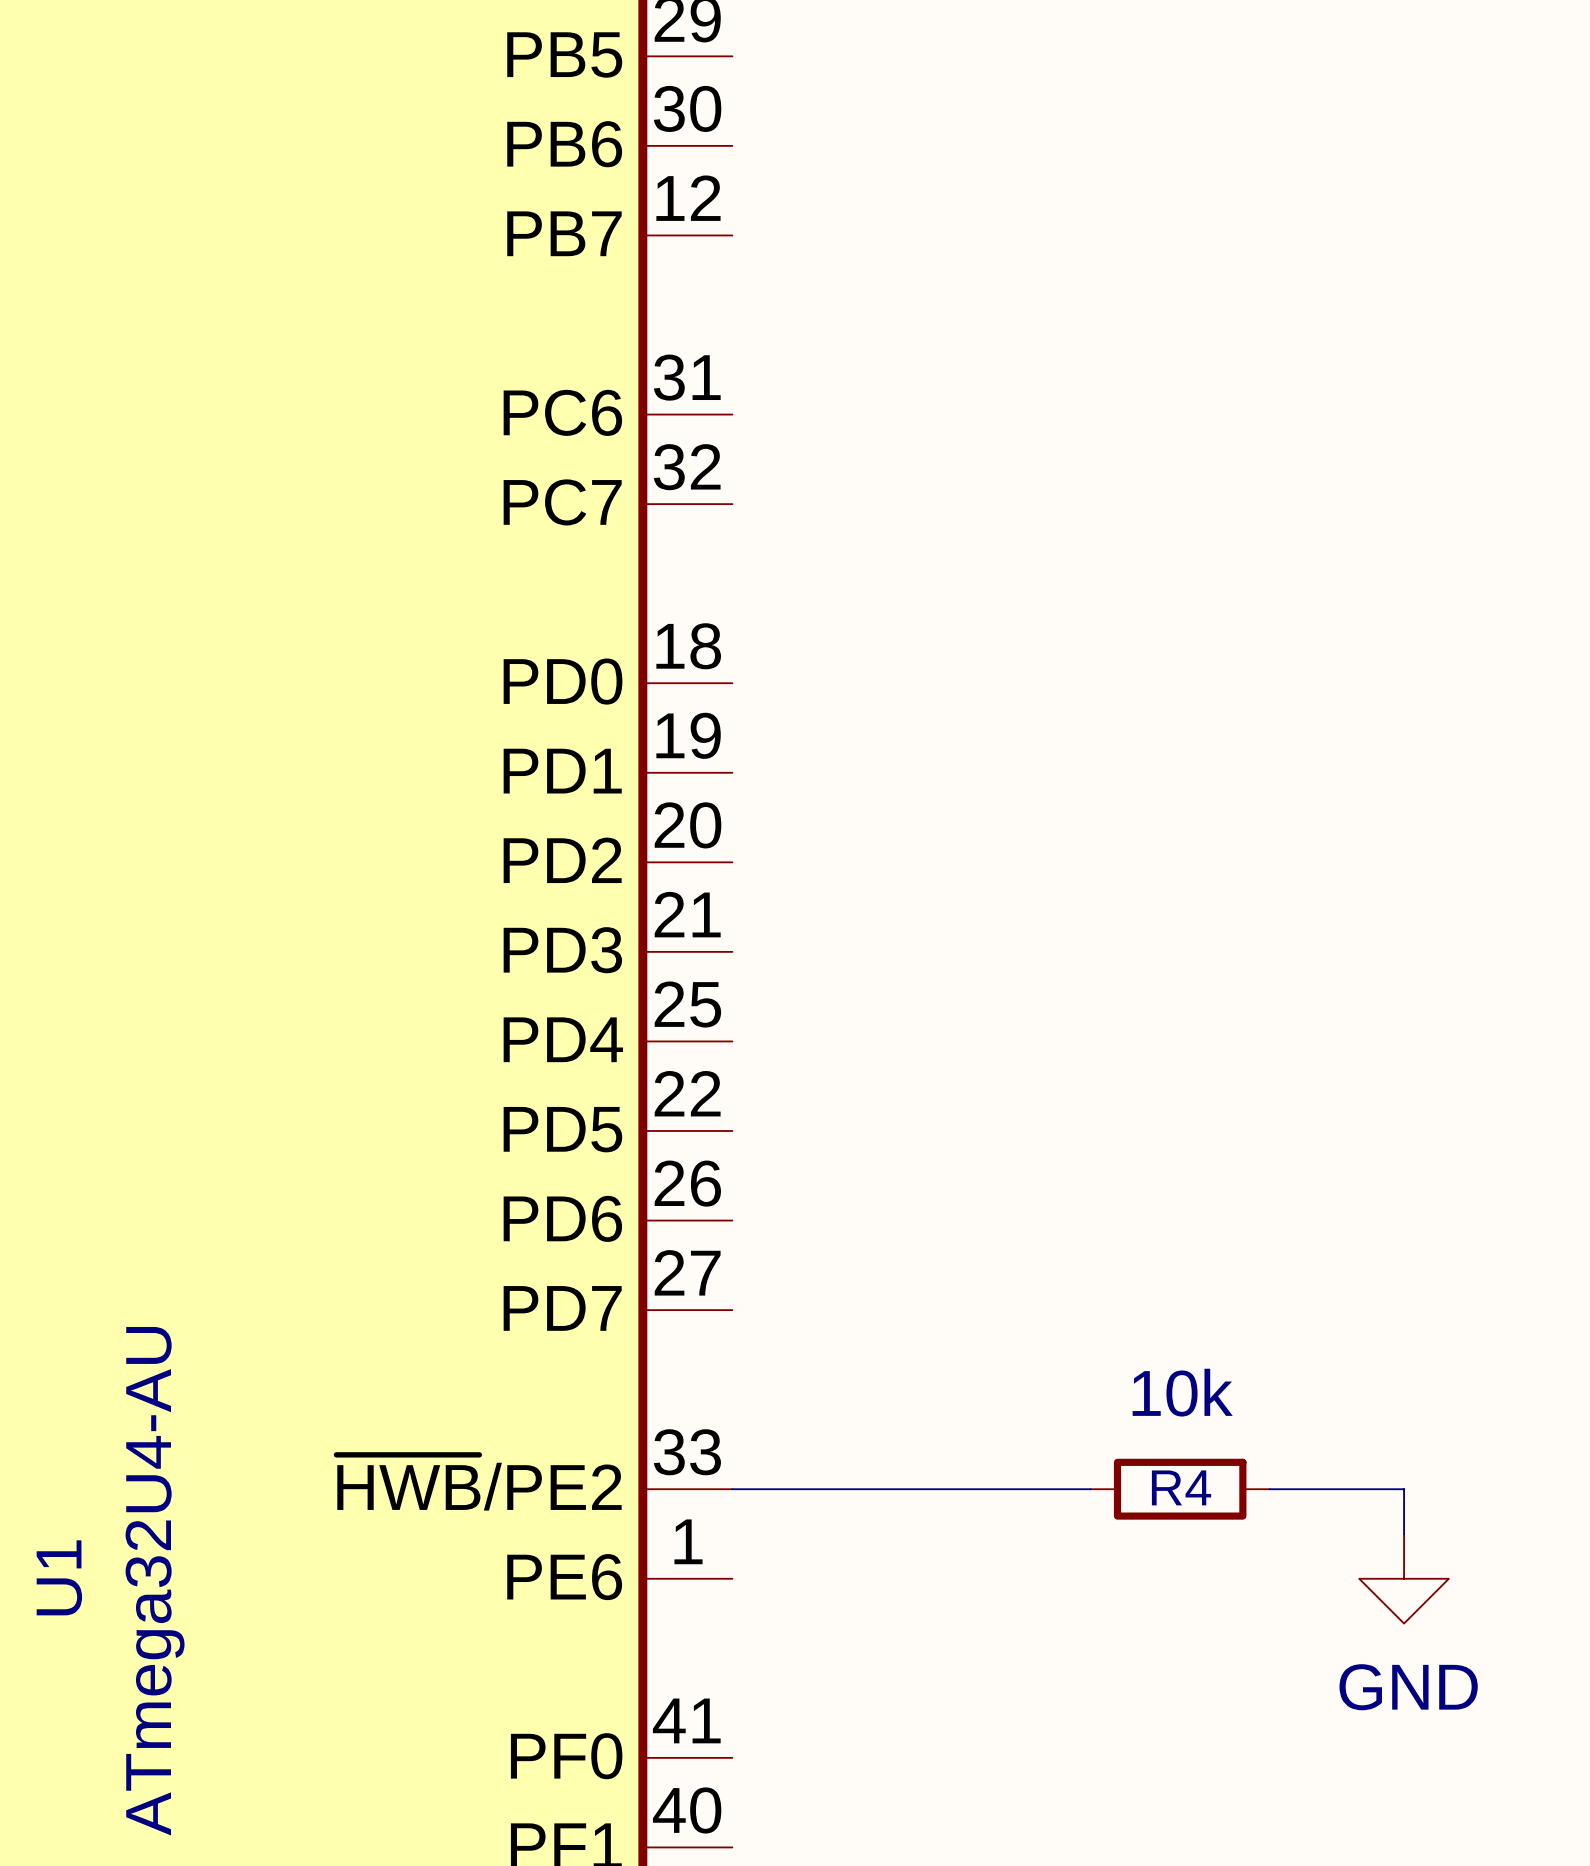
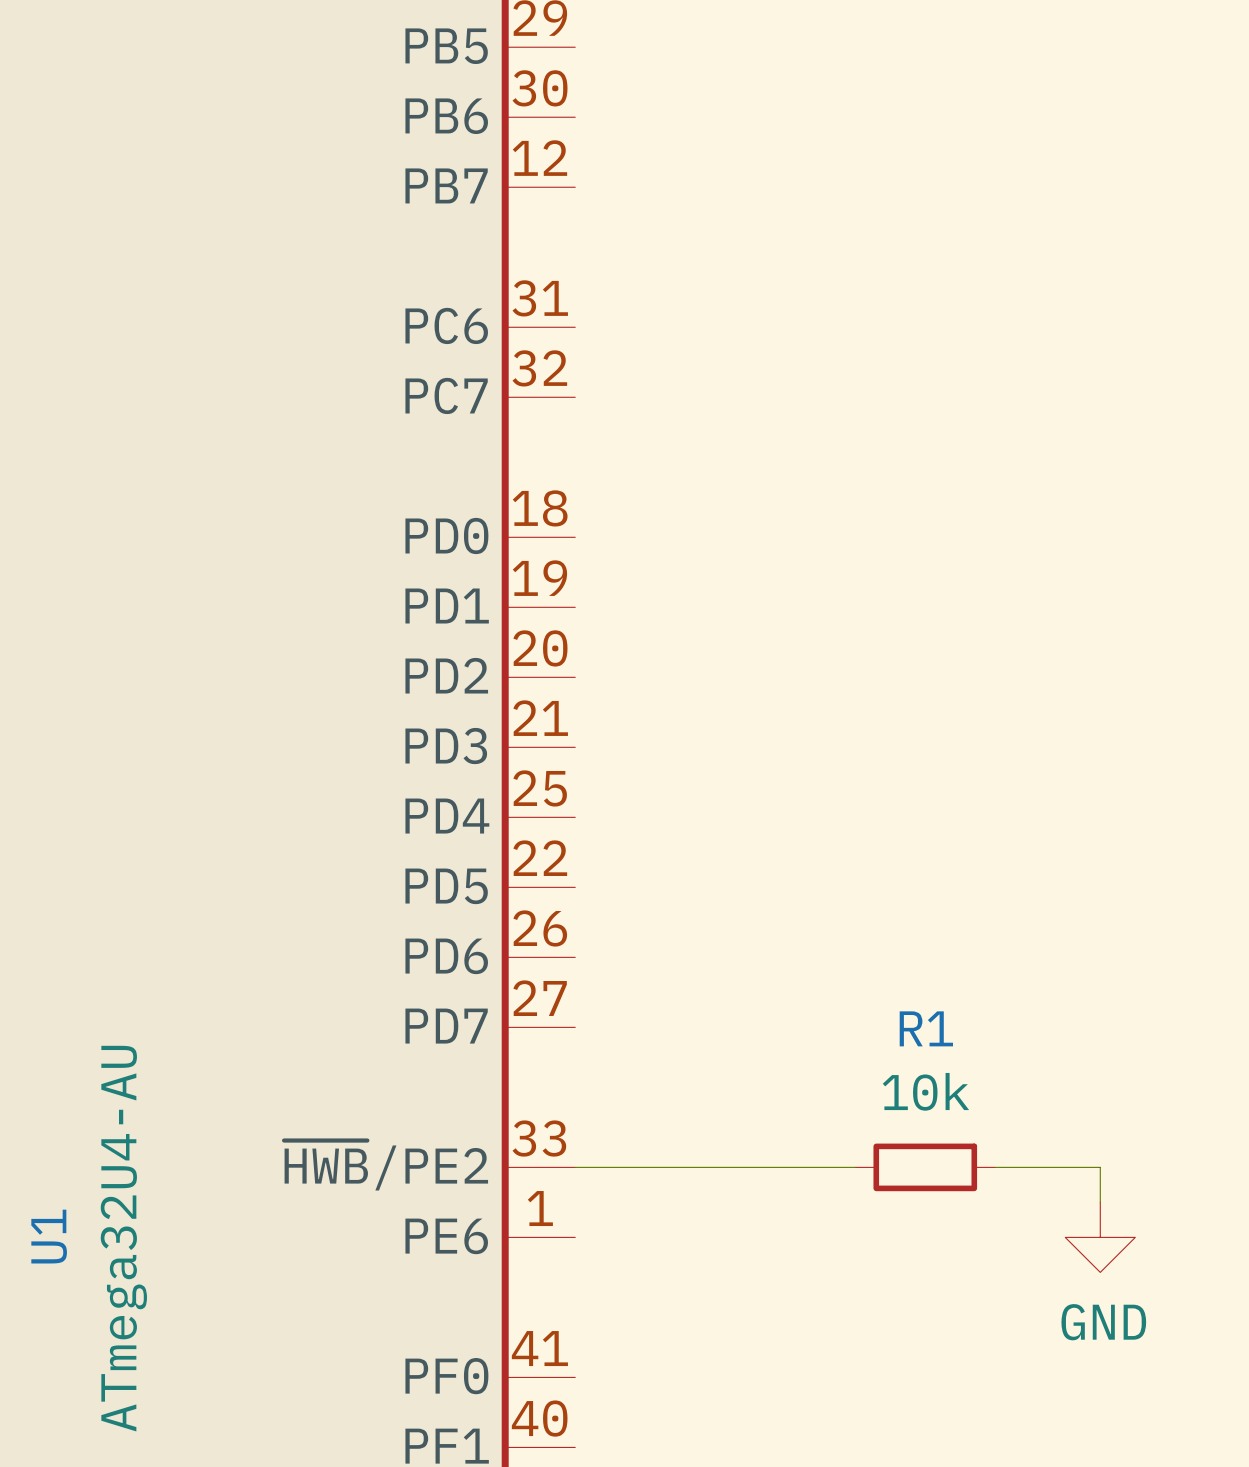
R4 name: R4 (1181, 1487) -> R1 (926, 1028)

